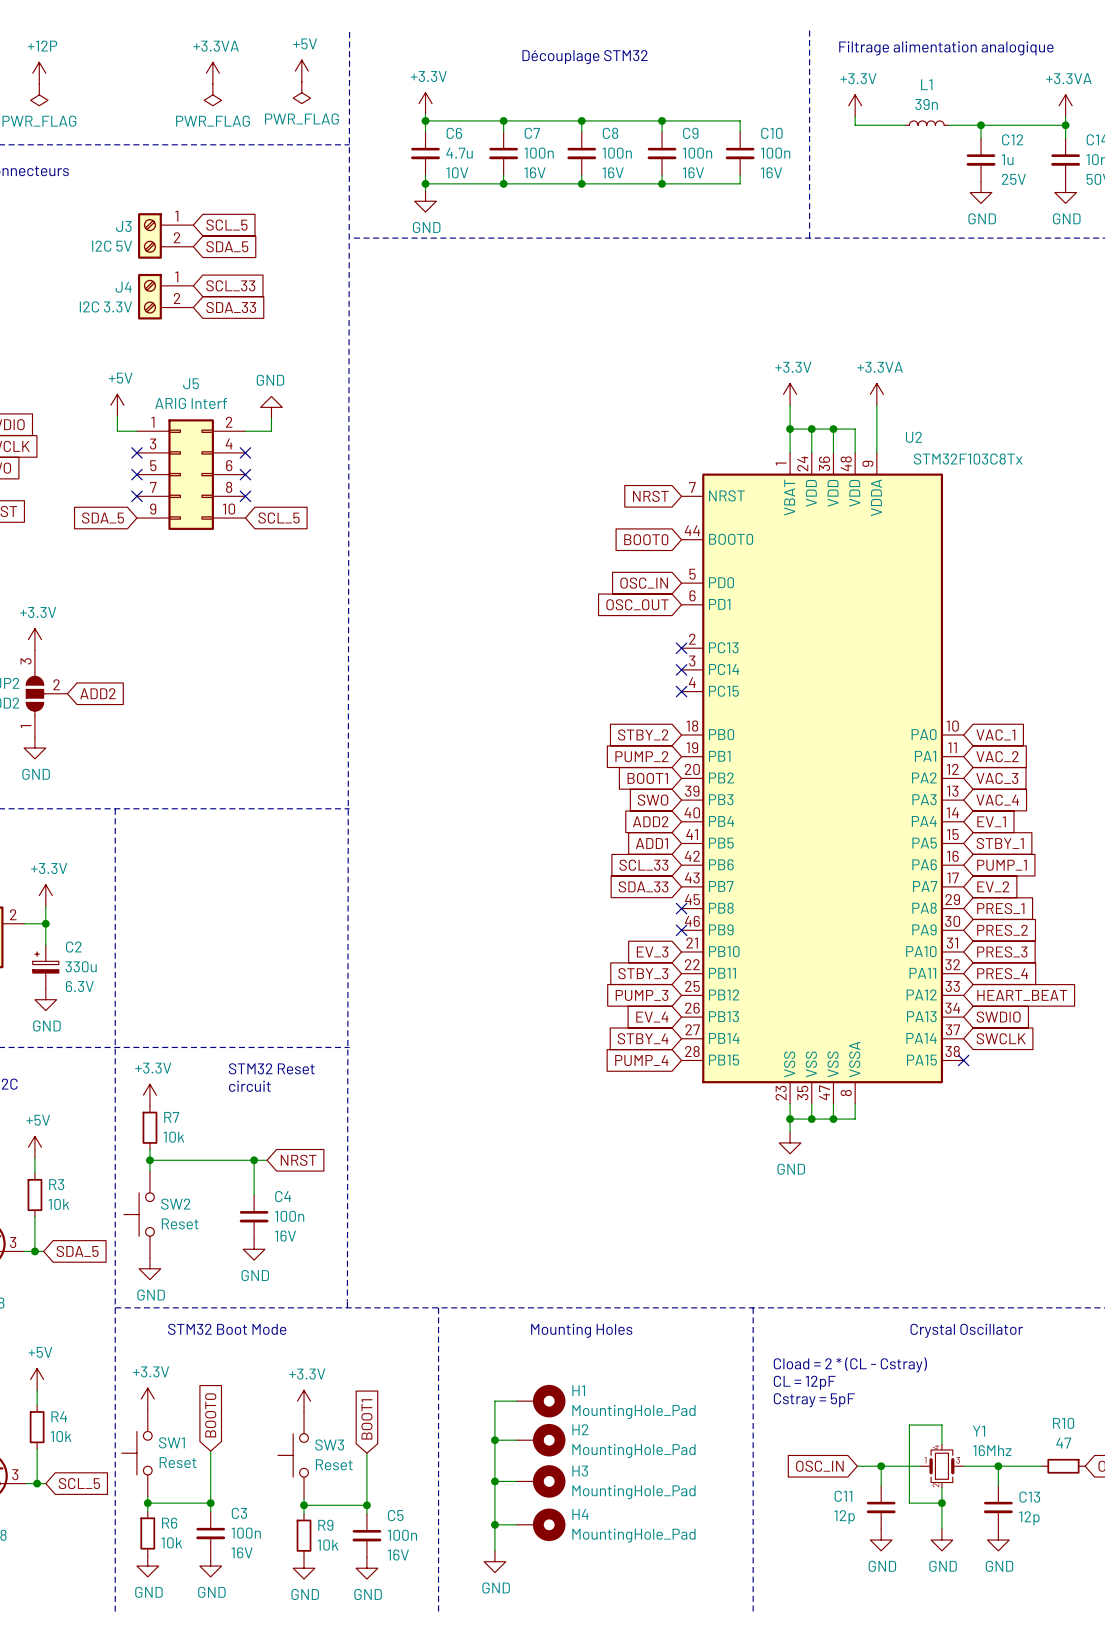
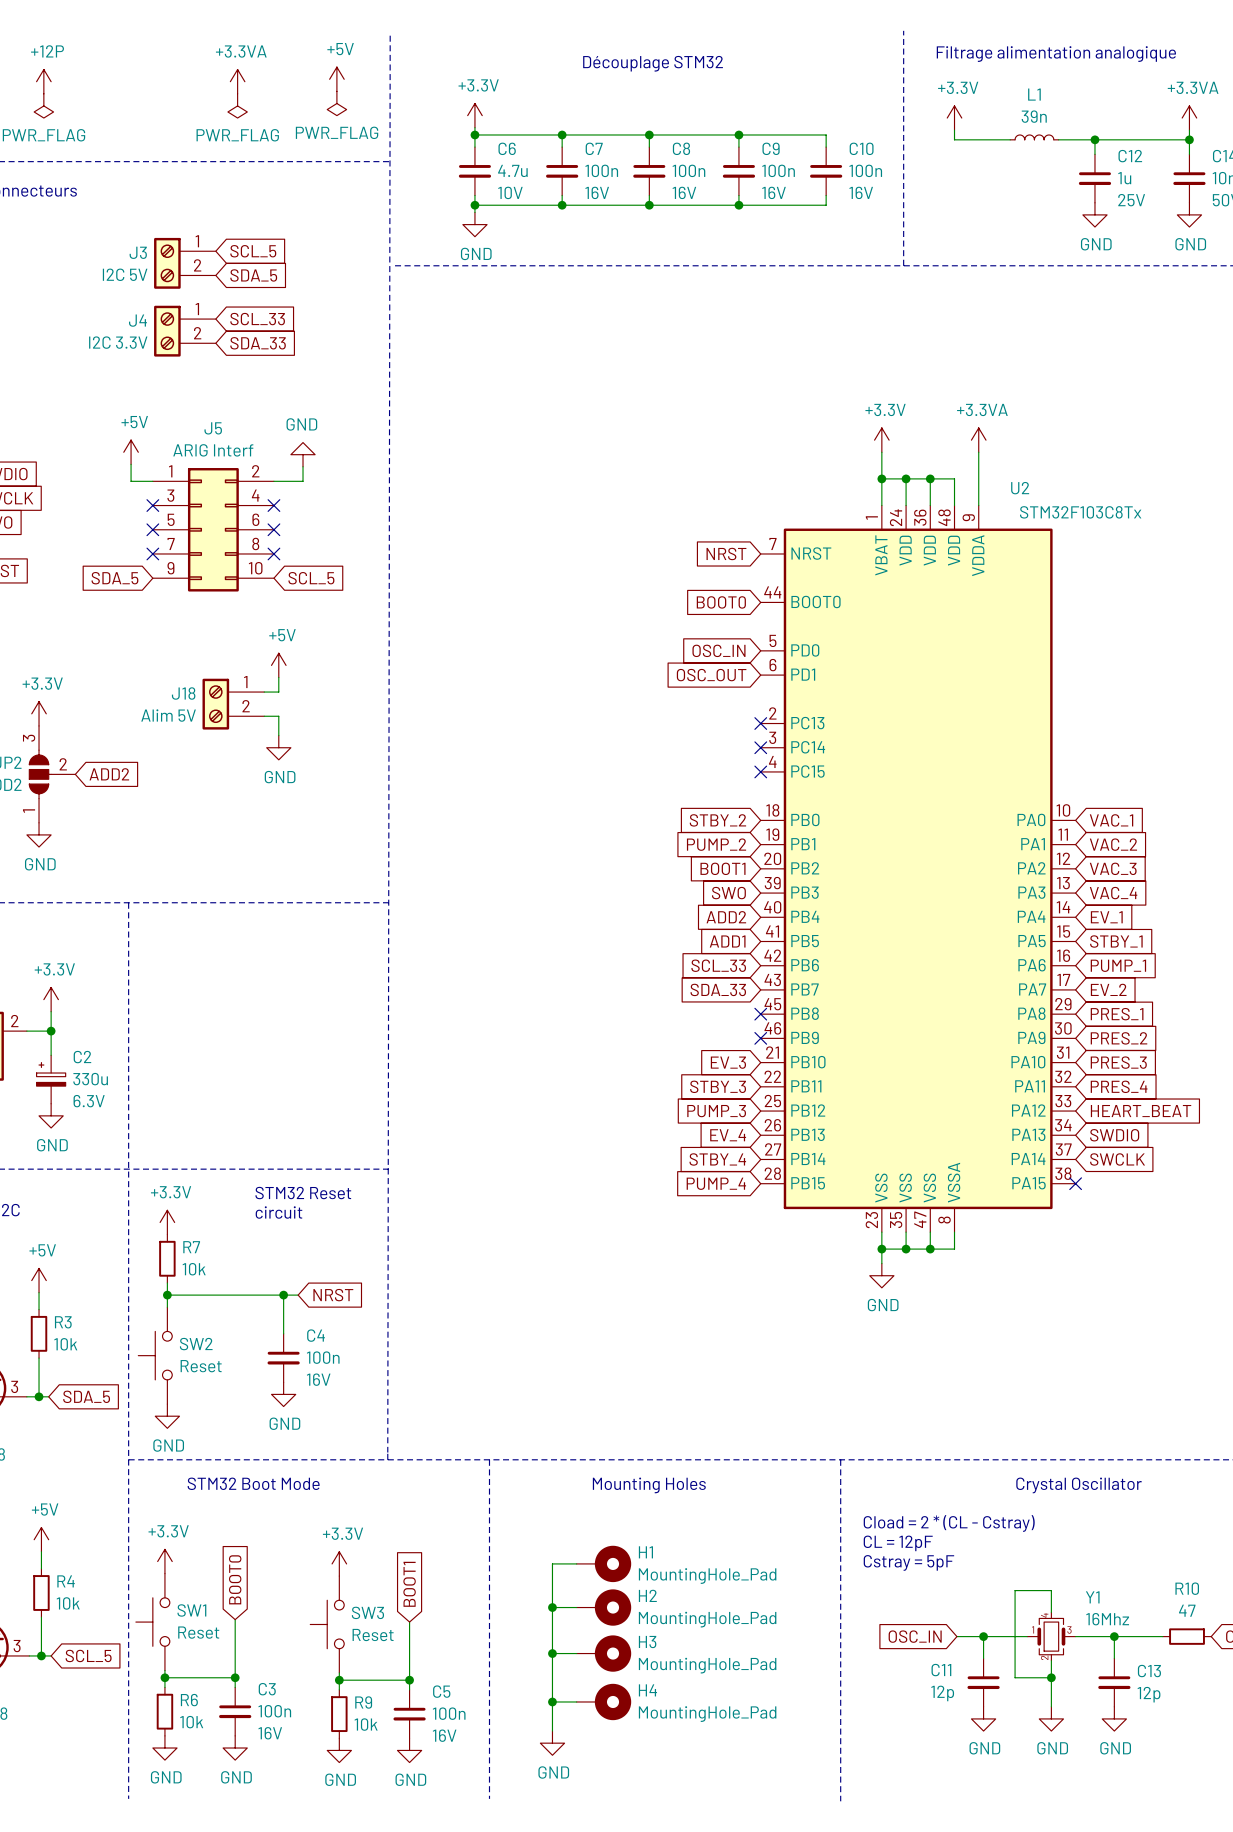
power symbol: none -> +5V (278, 665)
wire: none -> (278, 677) (278, 692) (264, 692)
J18: none -> Alim 5V (233, 704)
wire: none -> (264, 716) (278, 716) (278, 735)
power symbol: none -> GND (278, 747)

